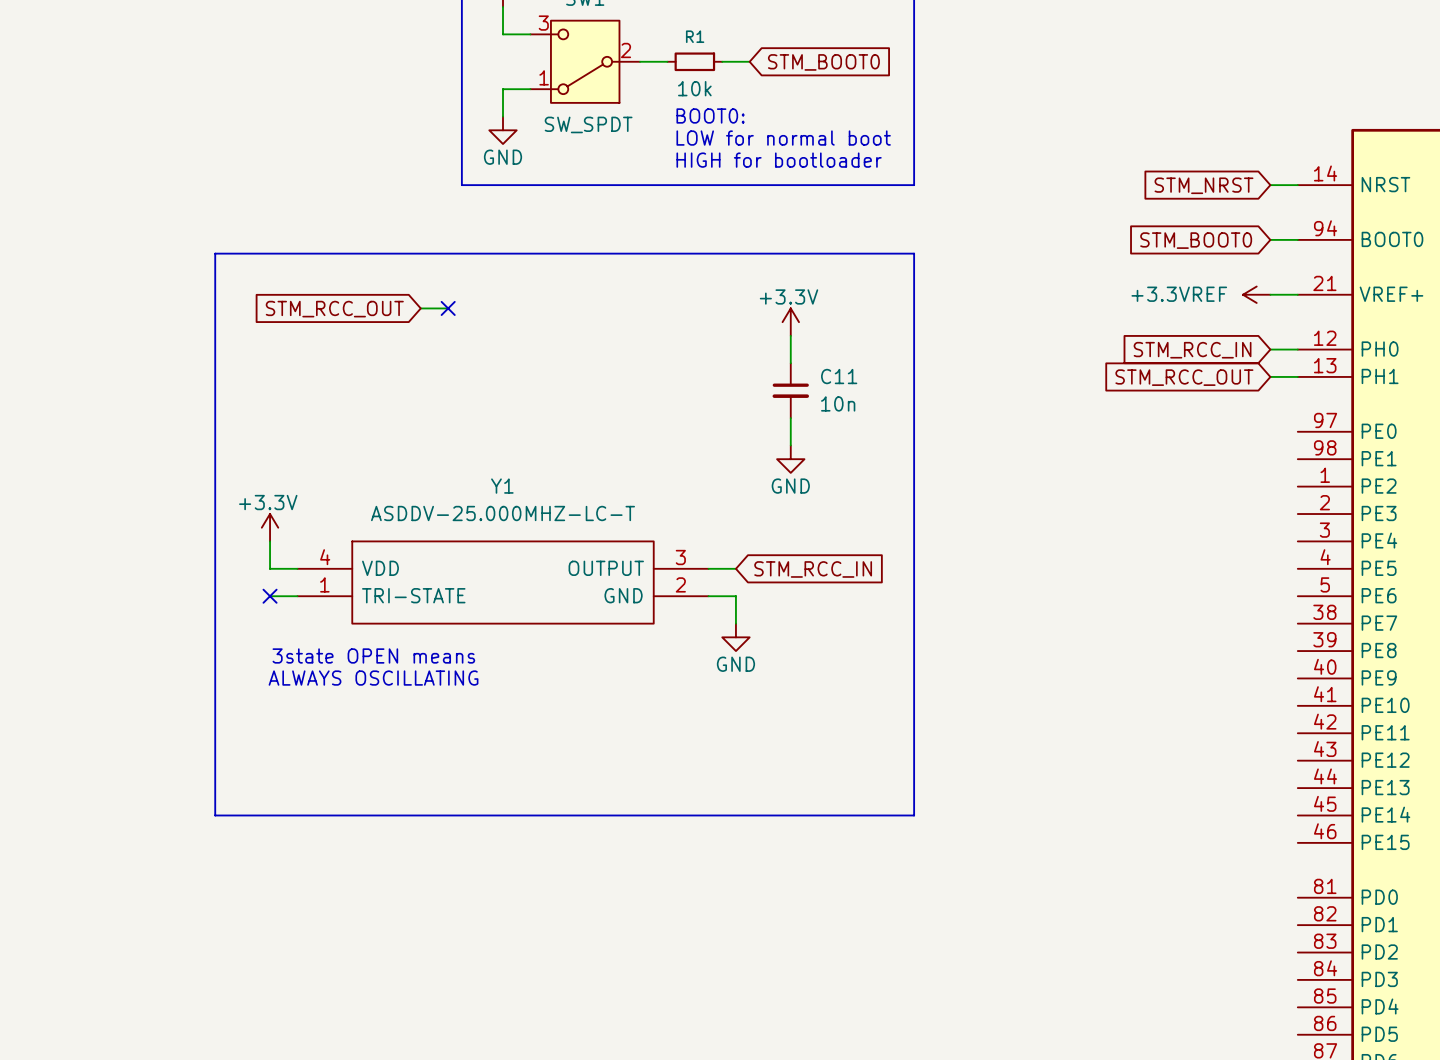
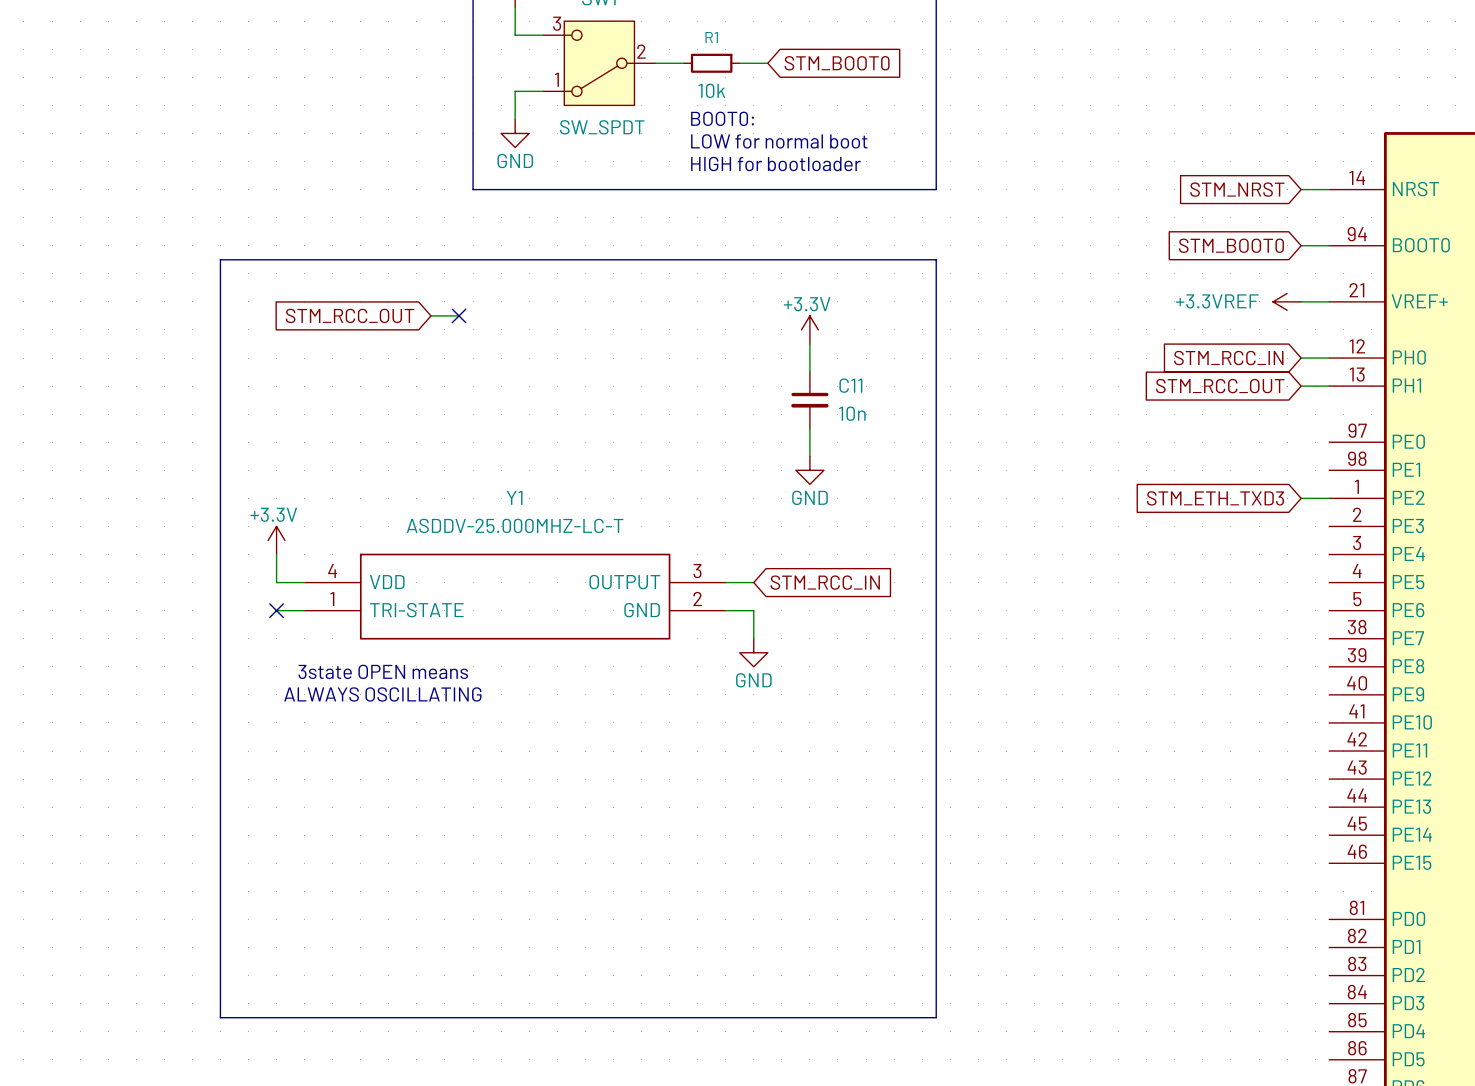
wire: none -> (1301, 498) (1329, 498)
global label: none -> STM_ETH_TXD3 (1215, 498)
line: (215, 815) (914, 815) -> (220, 835) (220, 1017) (936, 1017) (936, 835)

